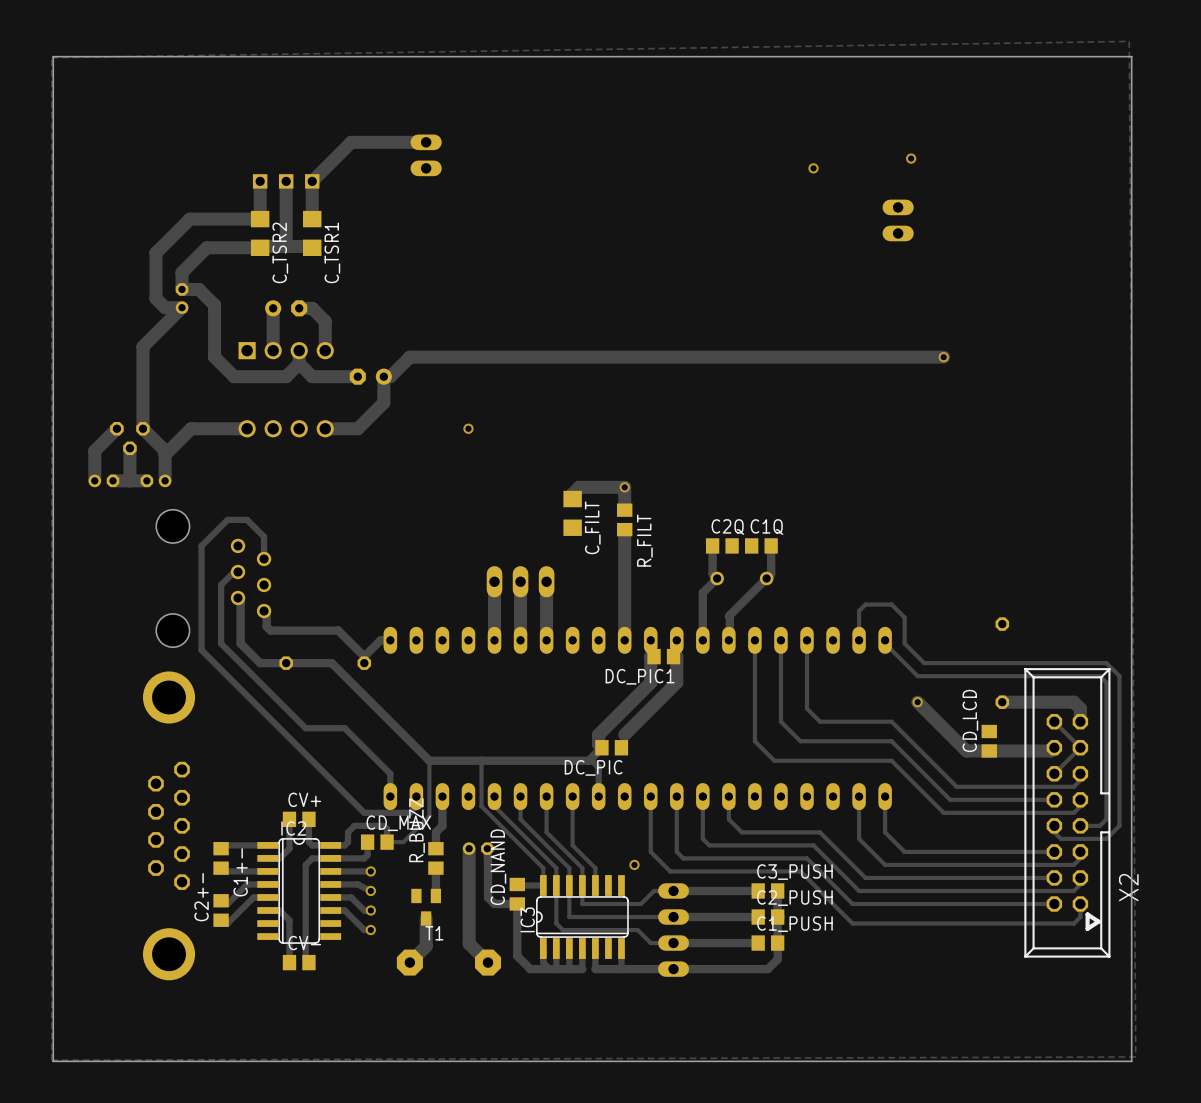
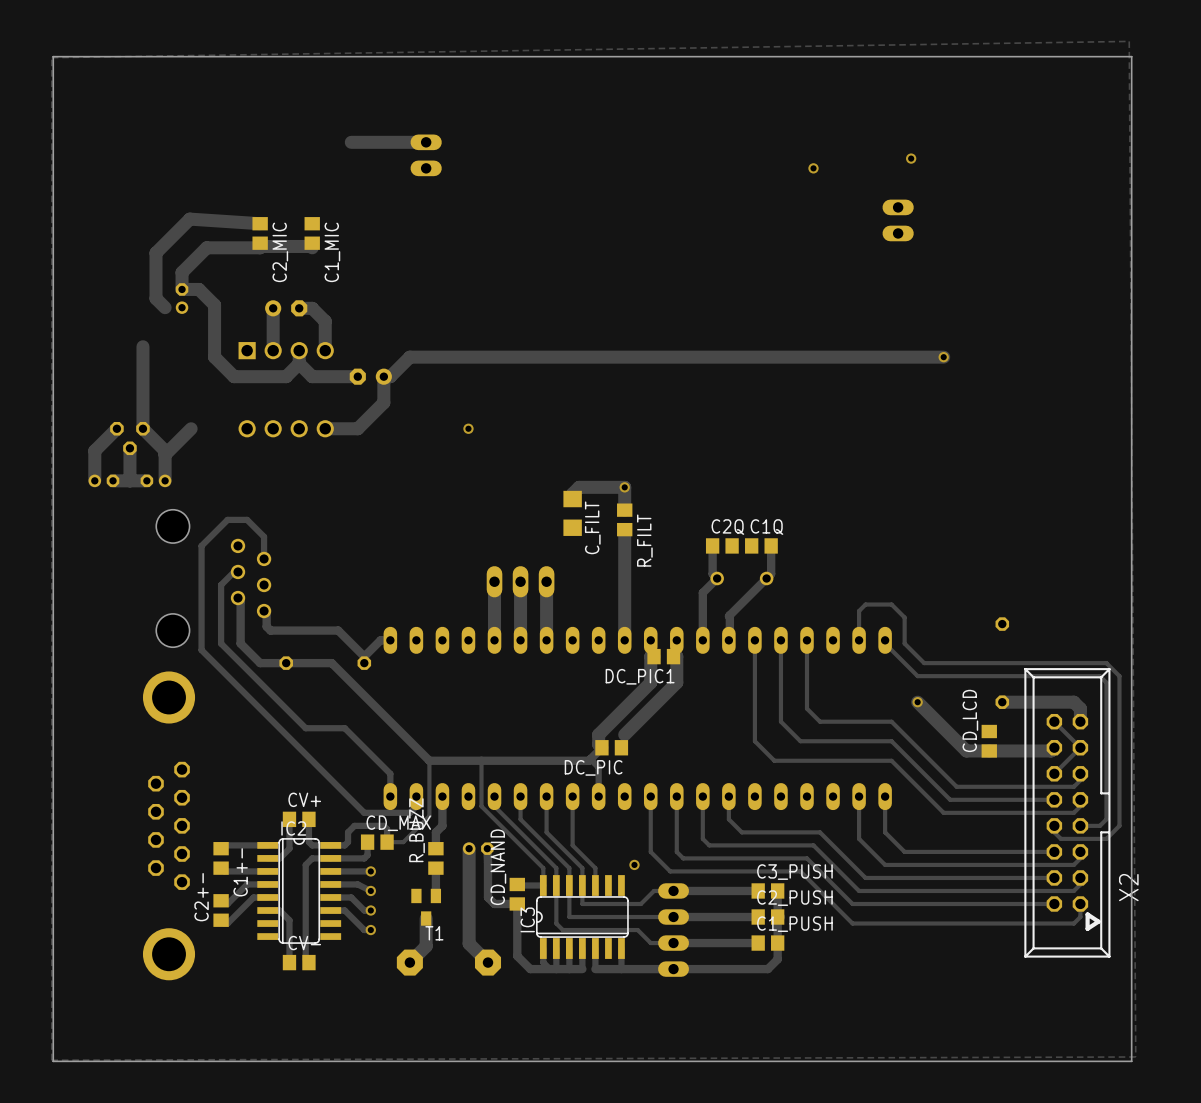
track: (351, 142) (312, 181) (312, 219) -> none
track: (260, 181) (260, 219) (189, 219) -> (260, 223) (189, 219)
track: (286, 181) (286, 246) -> none
part: (286, 181) -> none
C_TSR2: (260, 233) -> none
C2_MIC: none -> (260, 233)
C_TSR1: (312, 233) -> none
C1_MIC: none -> (312, 233)
track: (165, 307) (182, 307) (142, 346) -> none
track: (247, 428) (191, 428) -> none

